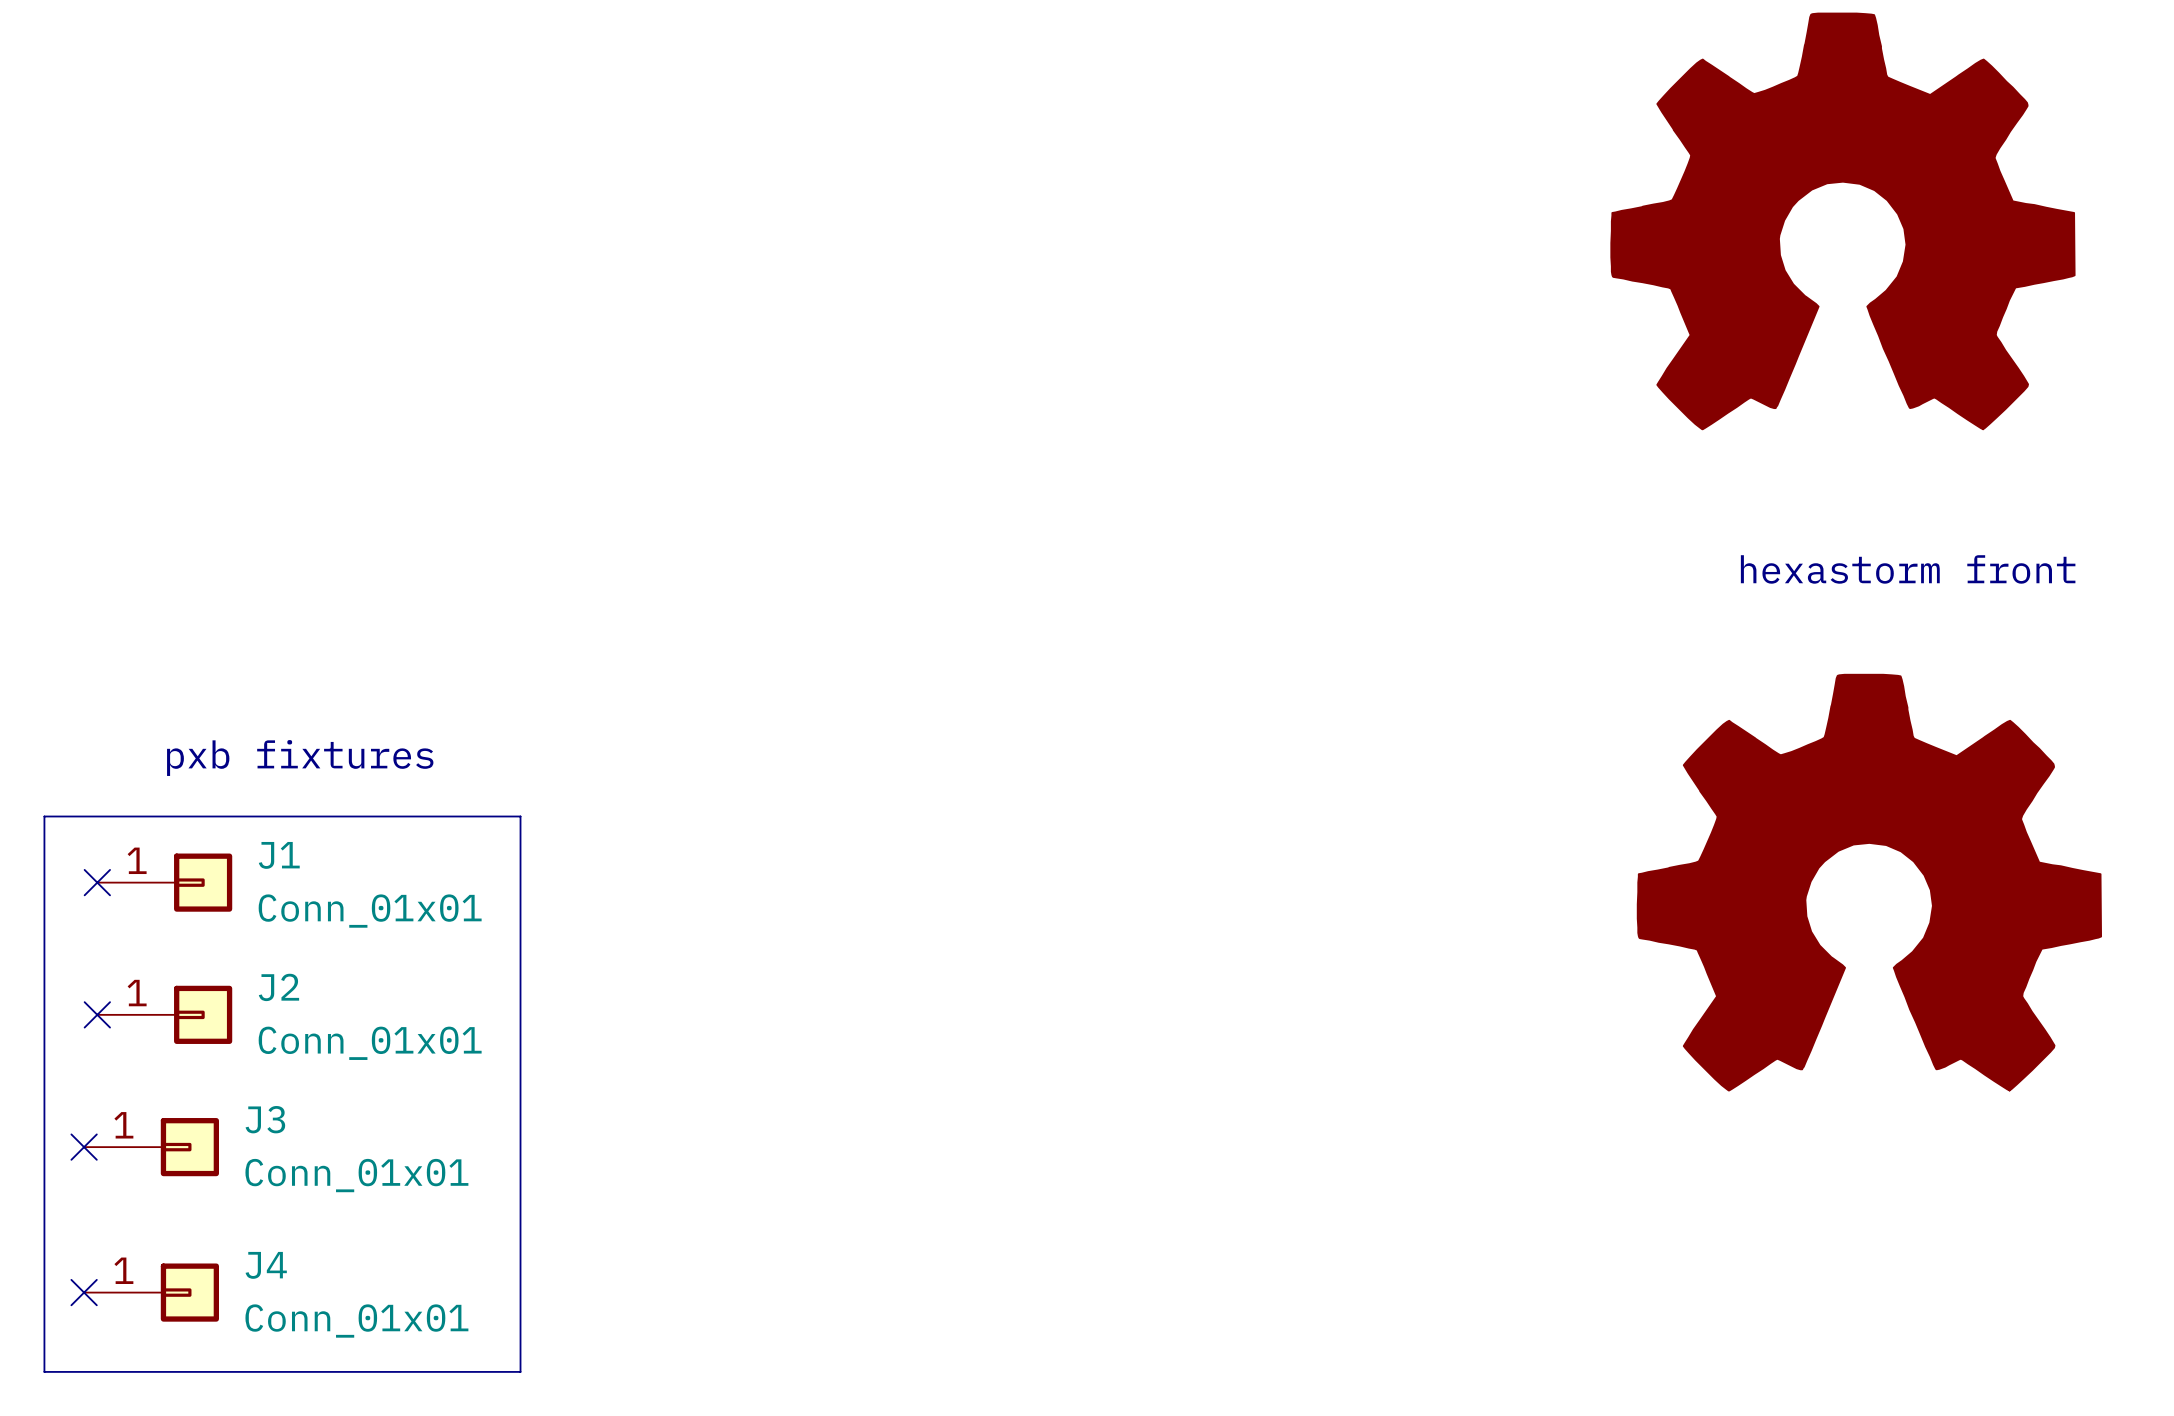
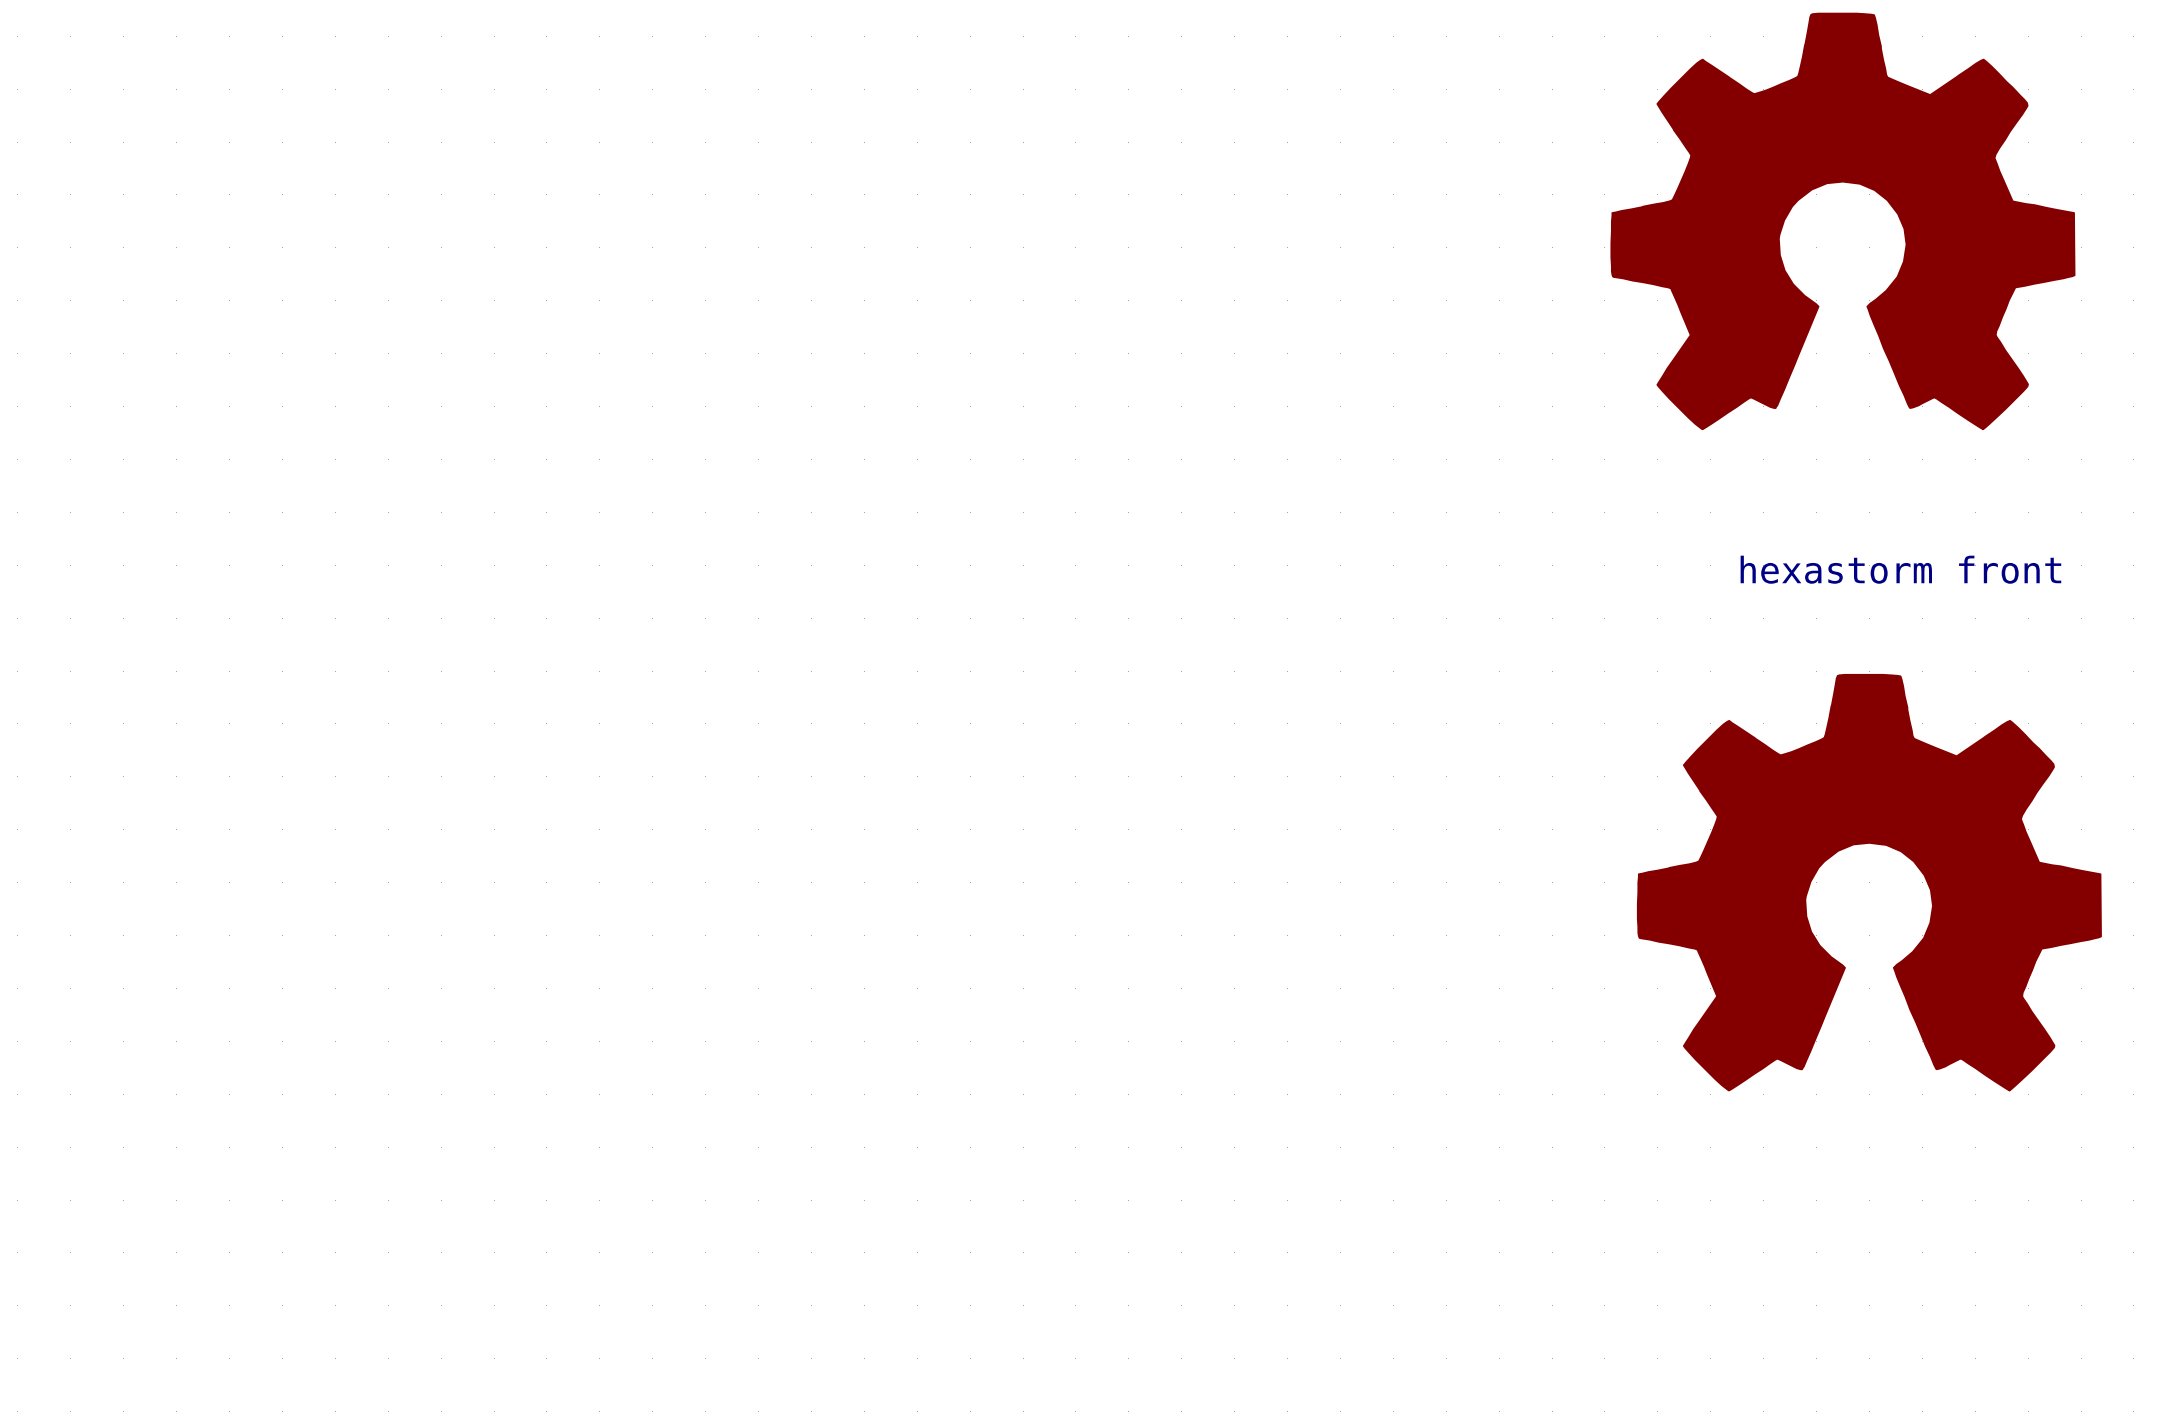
text: pxb fixtures (300, 758) -> none
line: (44, 816) (520, 816) (520, 1371) (44, 1371) (44, 816) -> none
no-connect mark: (97, 882) -> none
J1: Conn_01x01 (164, 882) -> none
no-connect mark: (97, 1014) -> none
J2: Conn_01x01 (164, 1014) -> none
no-connect mark: (84, 1147) -> none
J3: Conn_01x01 (151, 1147) -> none
no-connect mark: (84, 1292) -> none
J4: Conn_01x01 (151, 1292) -> none

